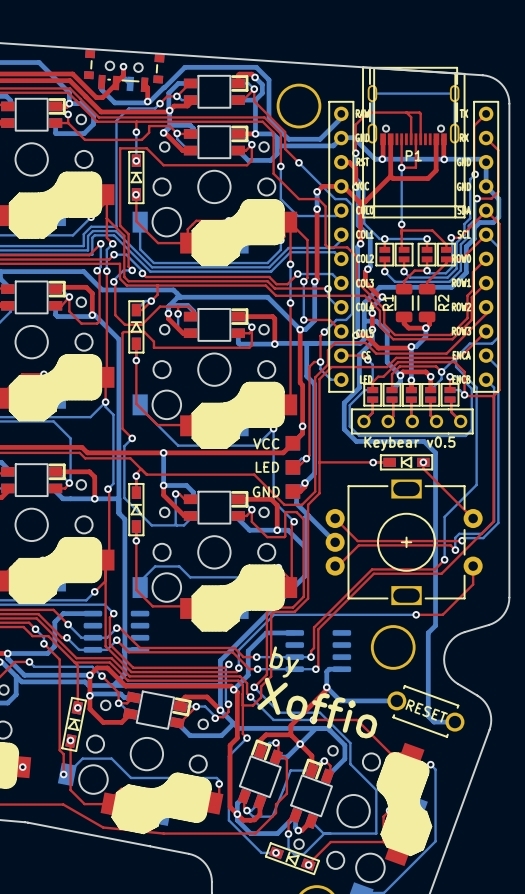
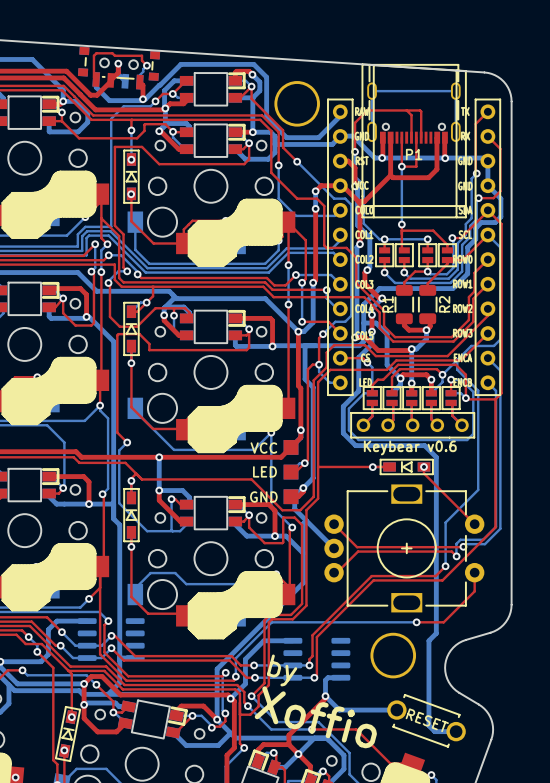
top track: none -> (146, 65) (141, 60) (141, 55) (96, 53) (93, 55) (93, 77) (96, 79)
bottom track: none -> (146, 65) (139, 75) (139, 82)
via: none -> (146, 65)
text: Keybear v0.5 (409, 443) -> Keybear v0.6 (410, 447)

